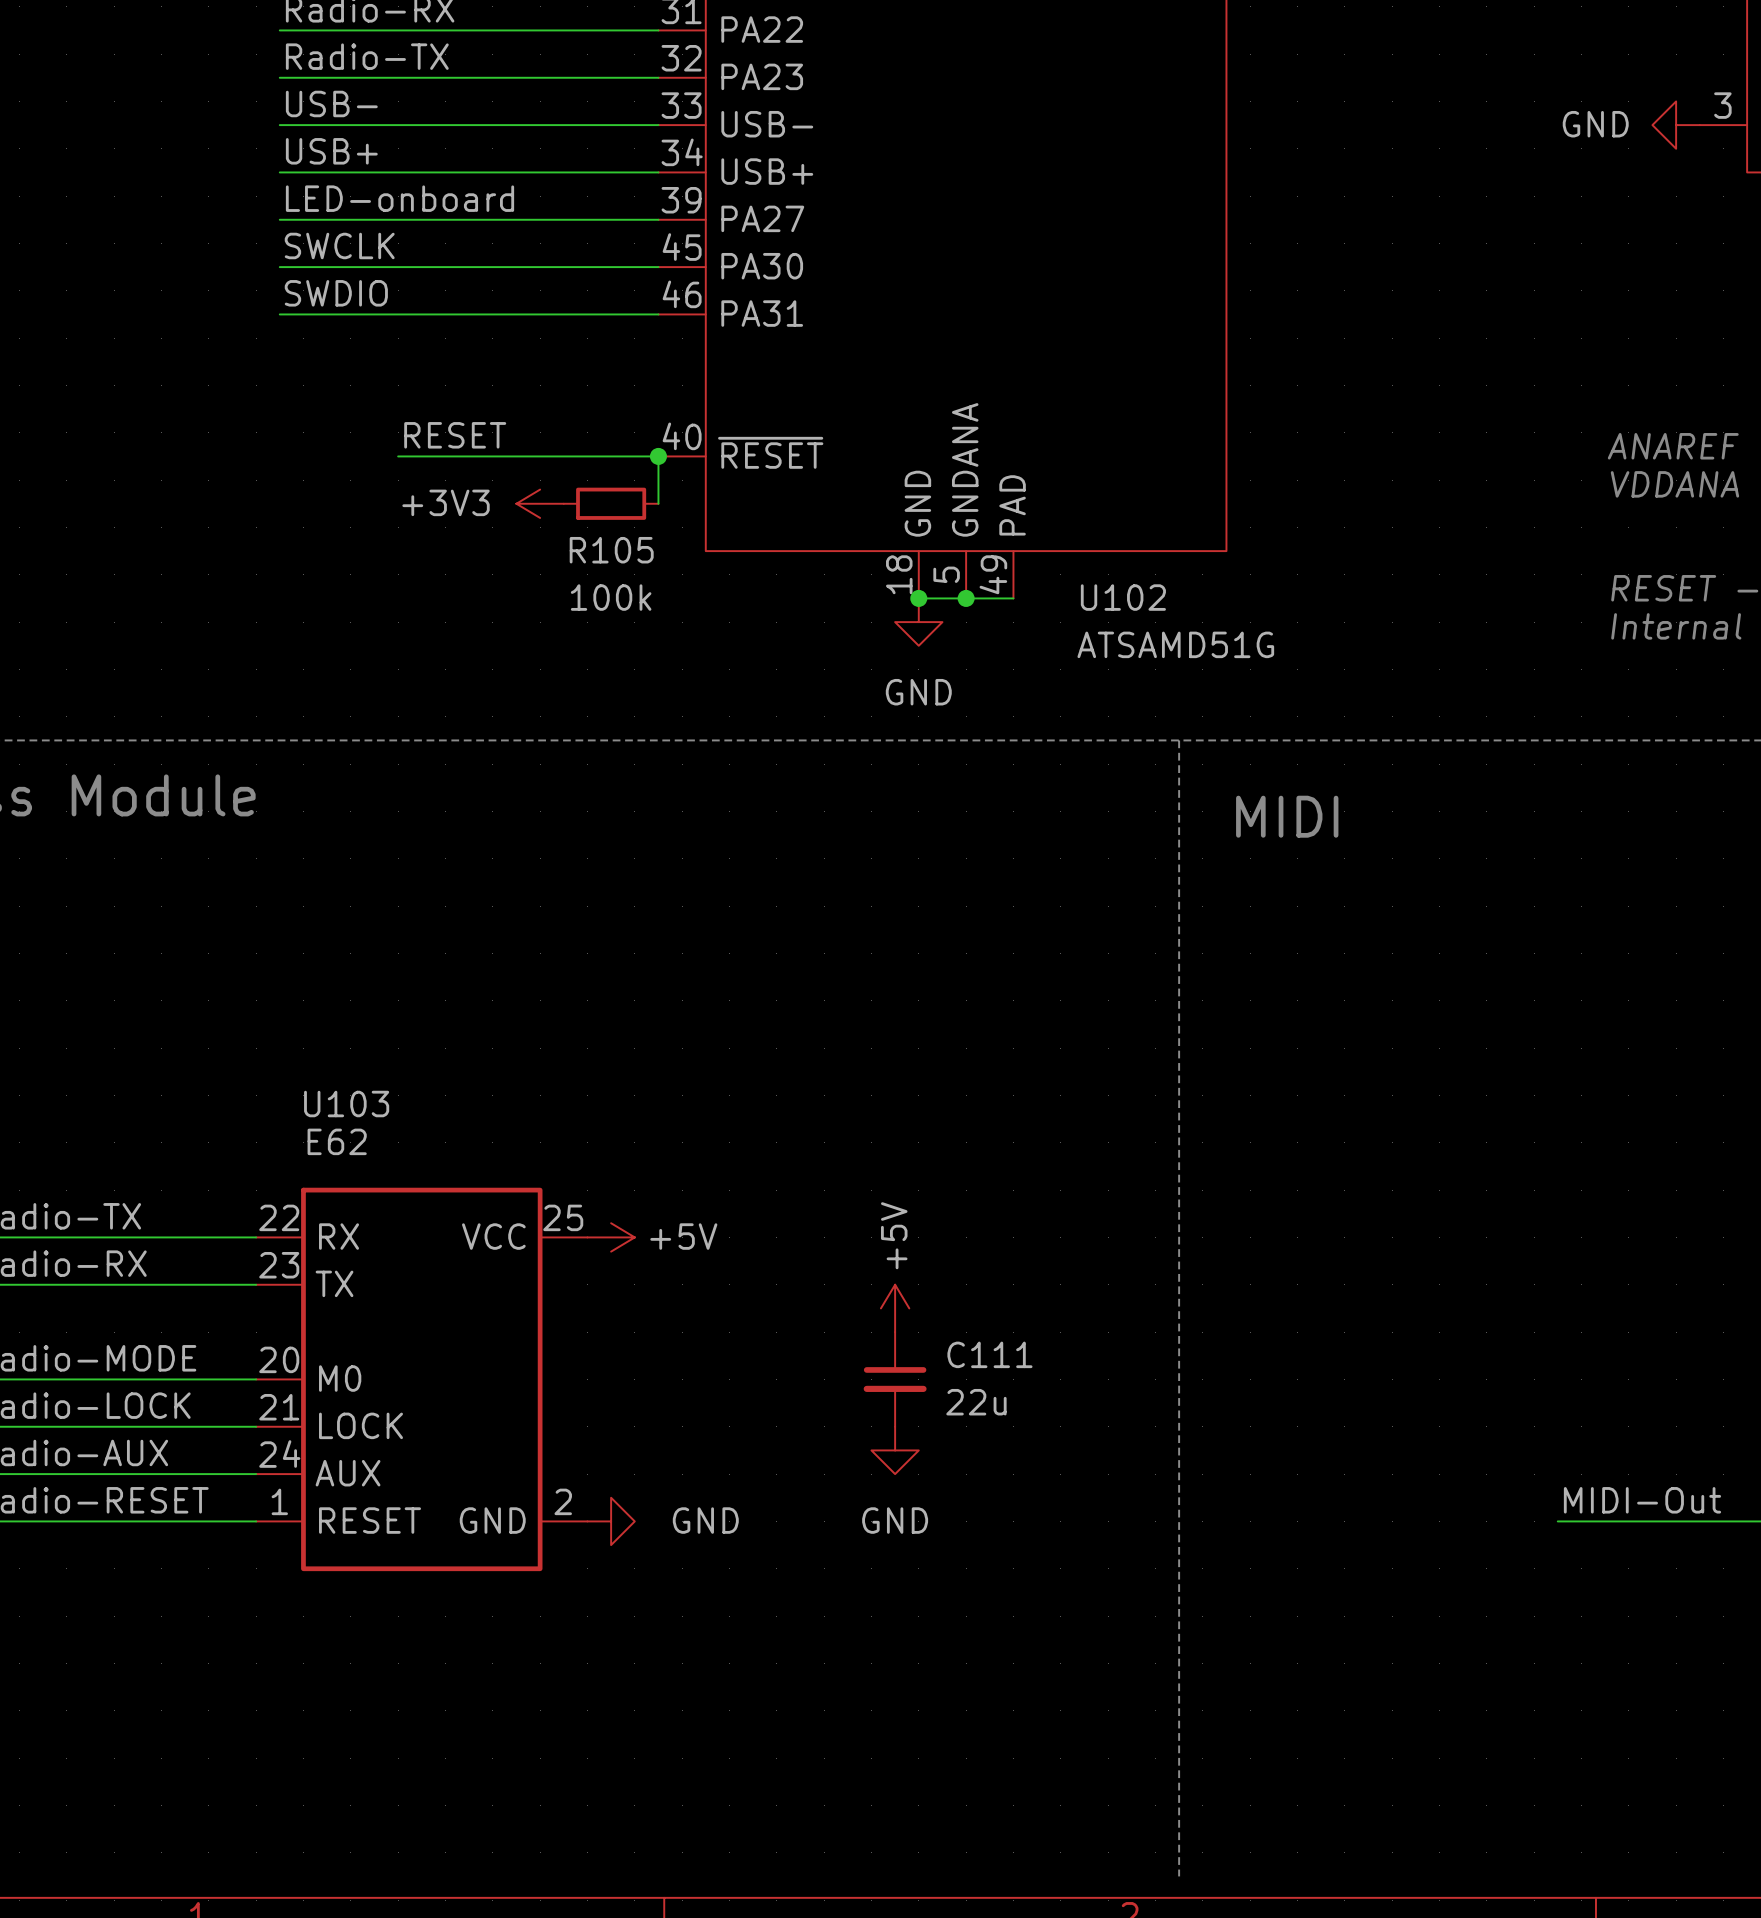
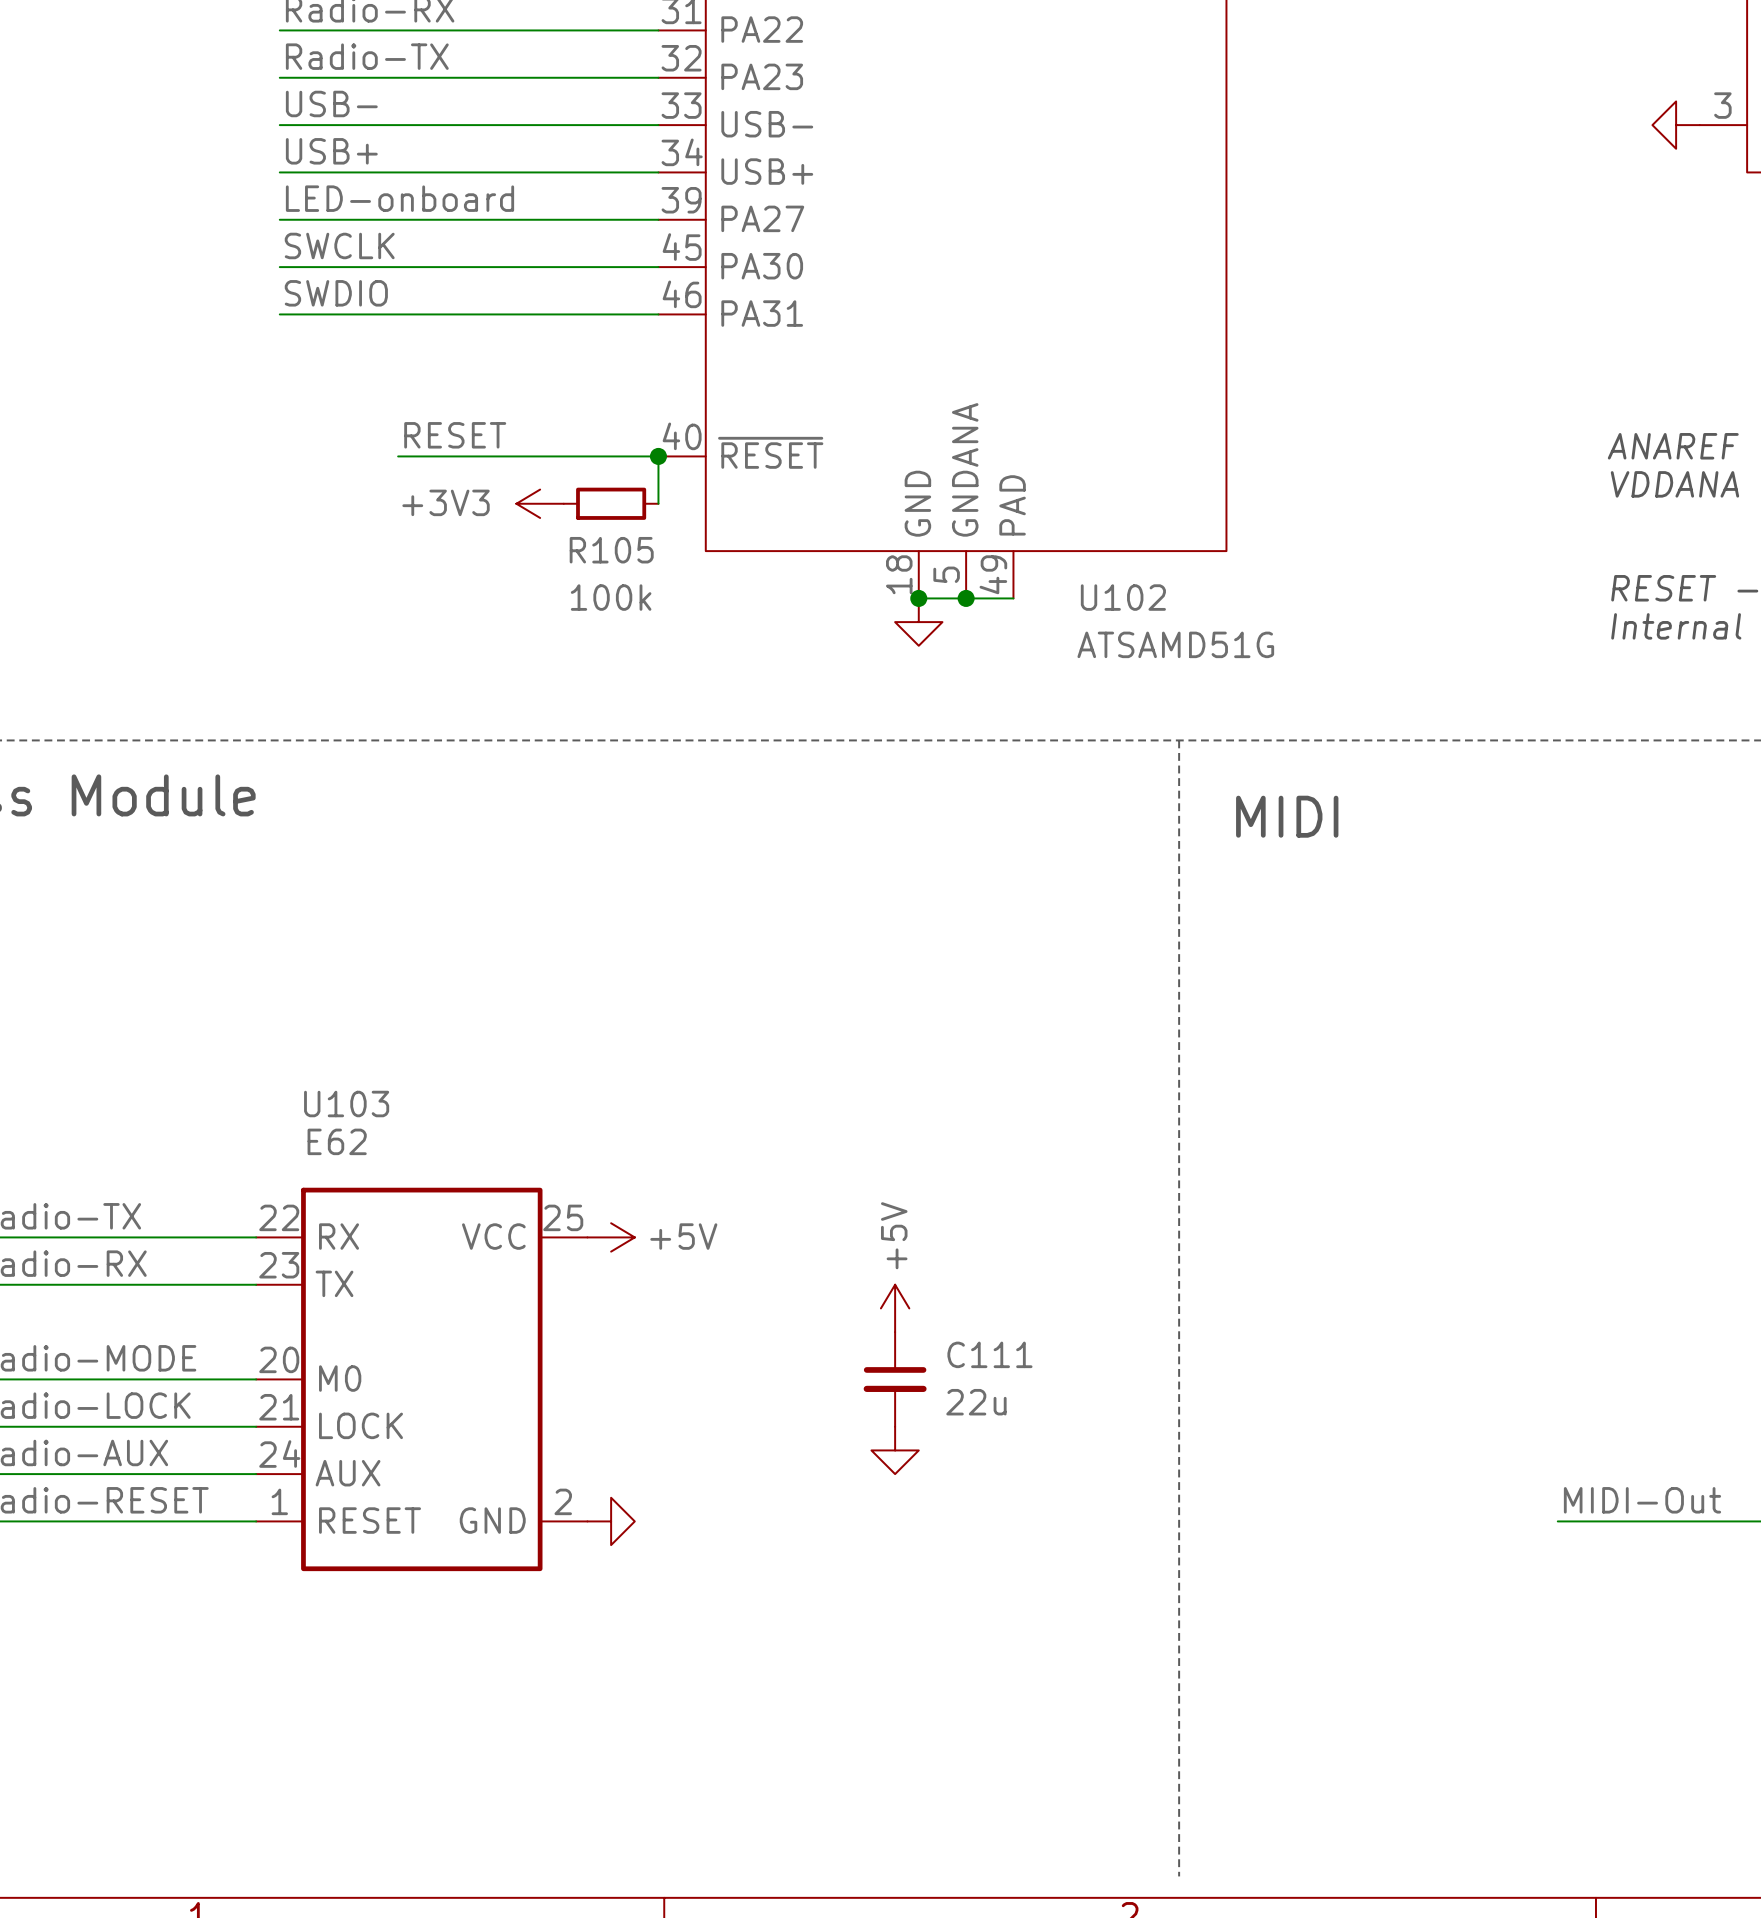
power symbol text: GND (1595, 124) -> none
power symbol text: GND (918, 692) -> none
power symbol text: GND (705, 1520) -> none
power symbol text: GND (895, 1520) -> none

